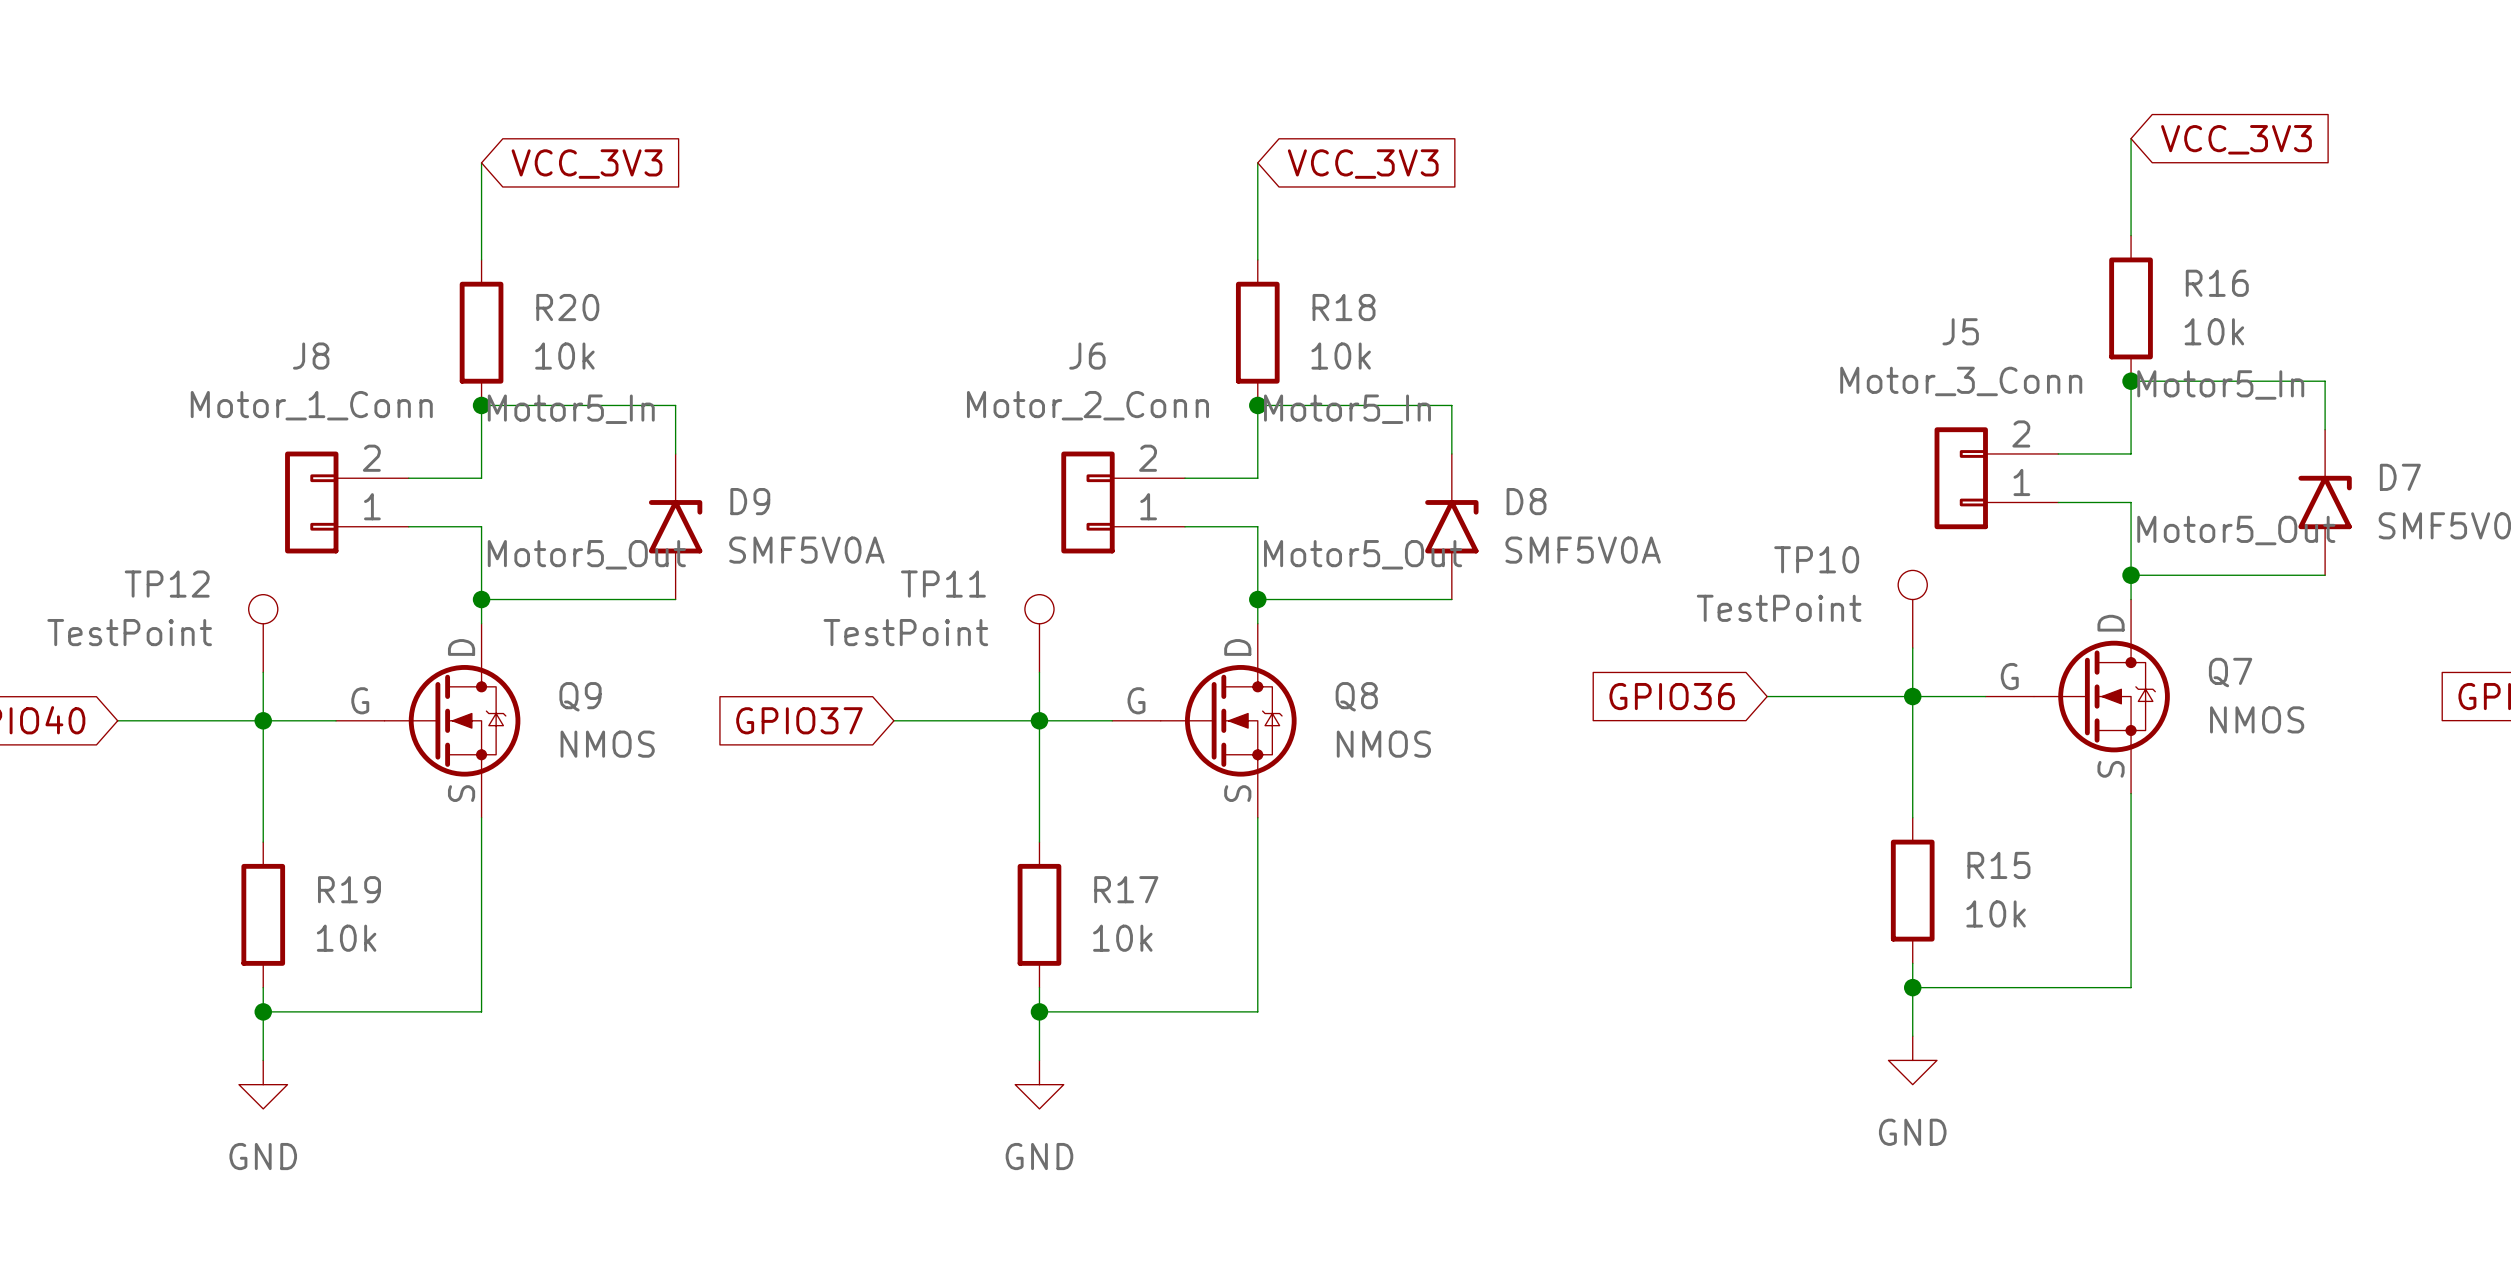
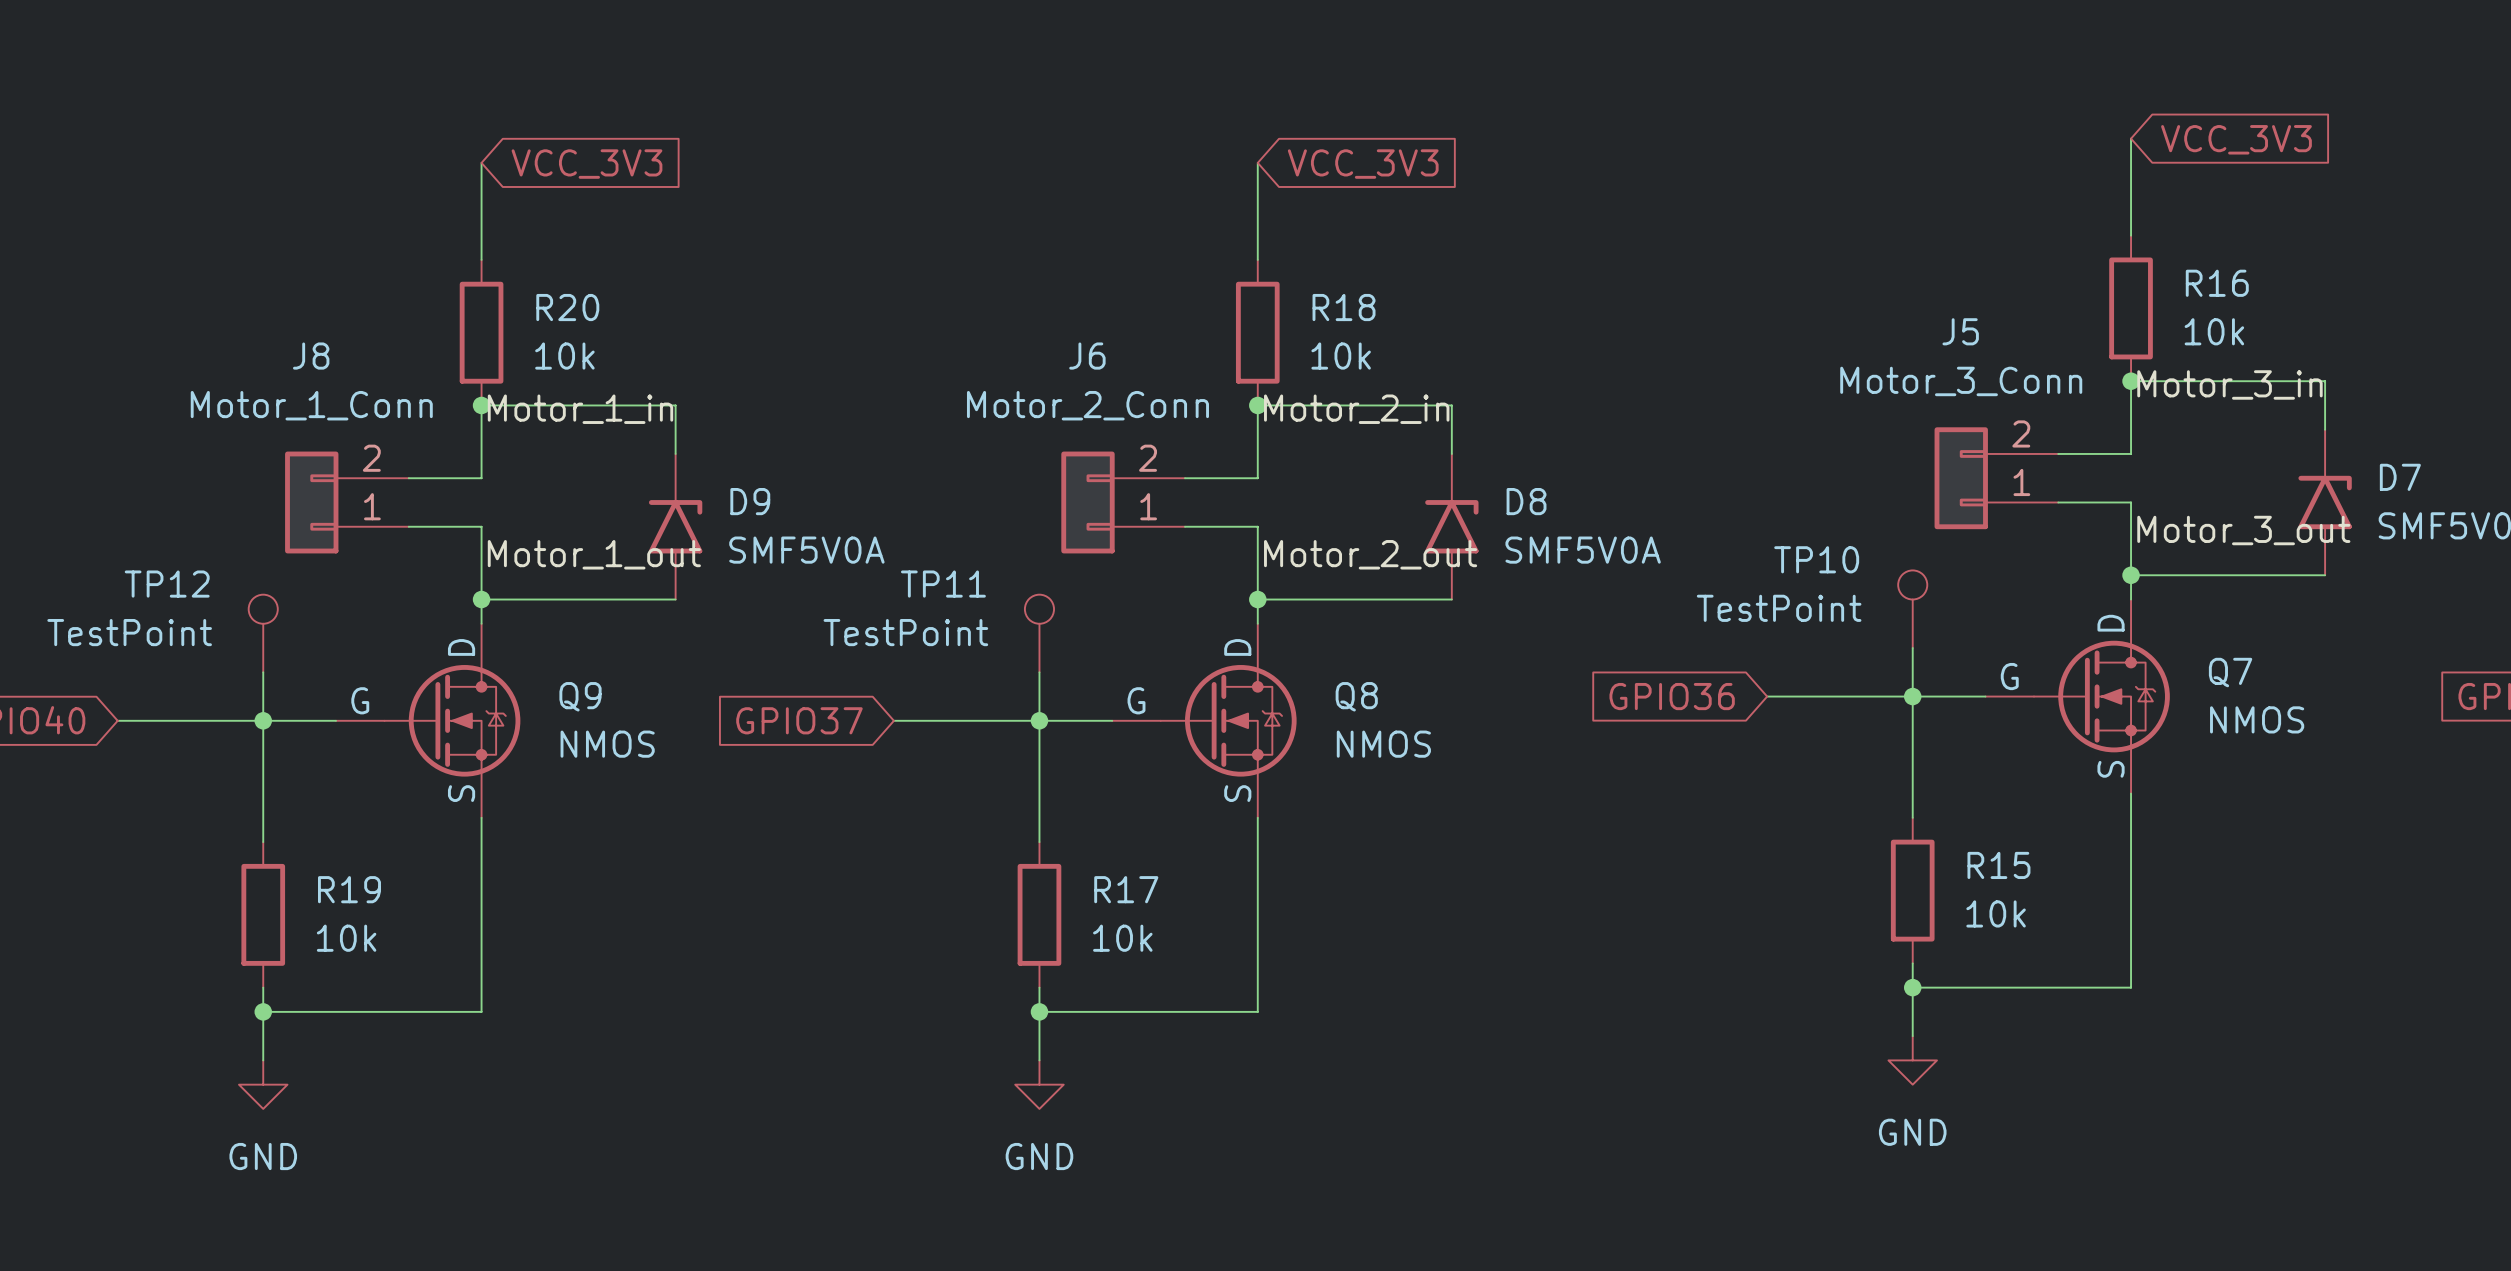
label: Motor5_In (2220, 384) -> Motor_3_in (2229, 384)
label: Motor5_In (571, 409) -> Motor_1_in (580, 409)
label: Motor5_In (1347, 409) -> Motor_2_in (1356, 409)
label: Motor5_Out (2236, 530) -> Motor_3_out (2243, 530)
label: Motor5_Out (586, 554) -> Motor_1_out (594, 554)
label: Motor5_Out (1363, 554) -> Motor_2_out (1370, 554)

